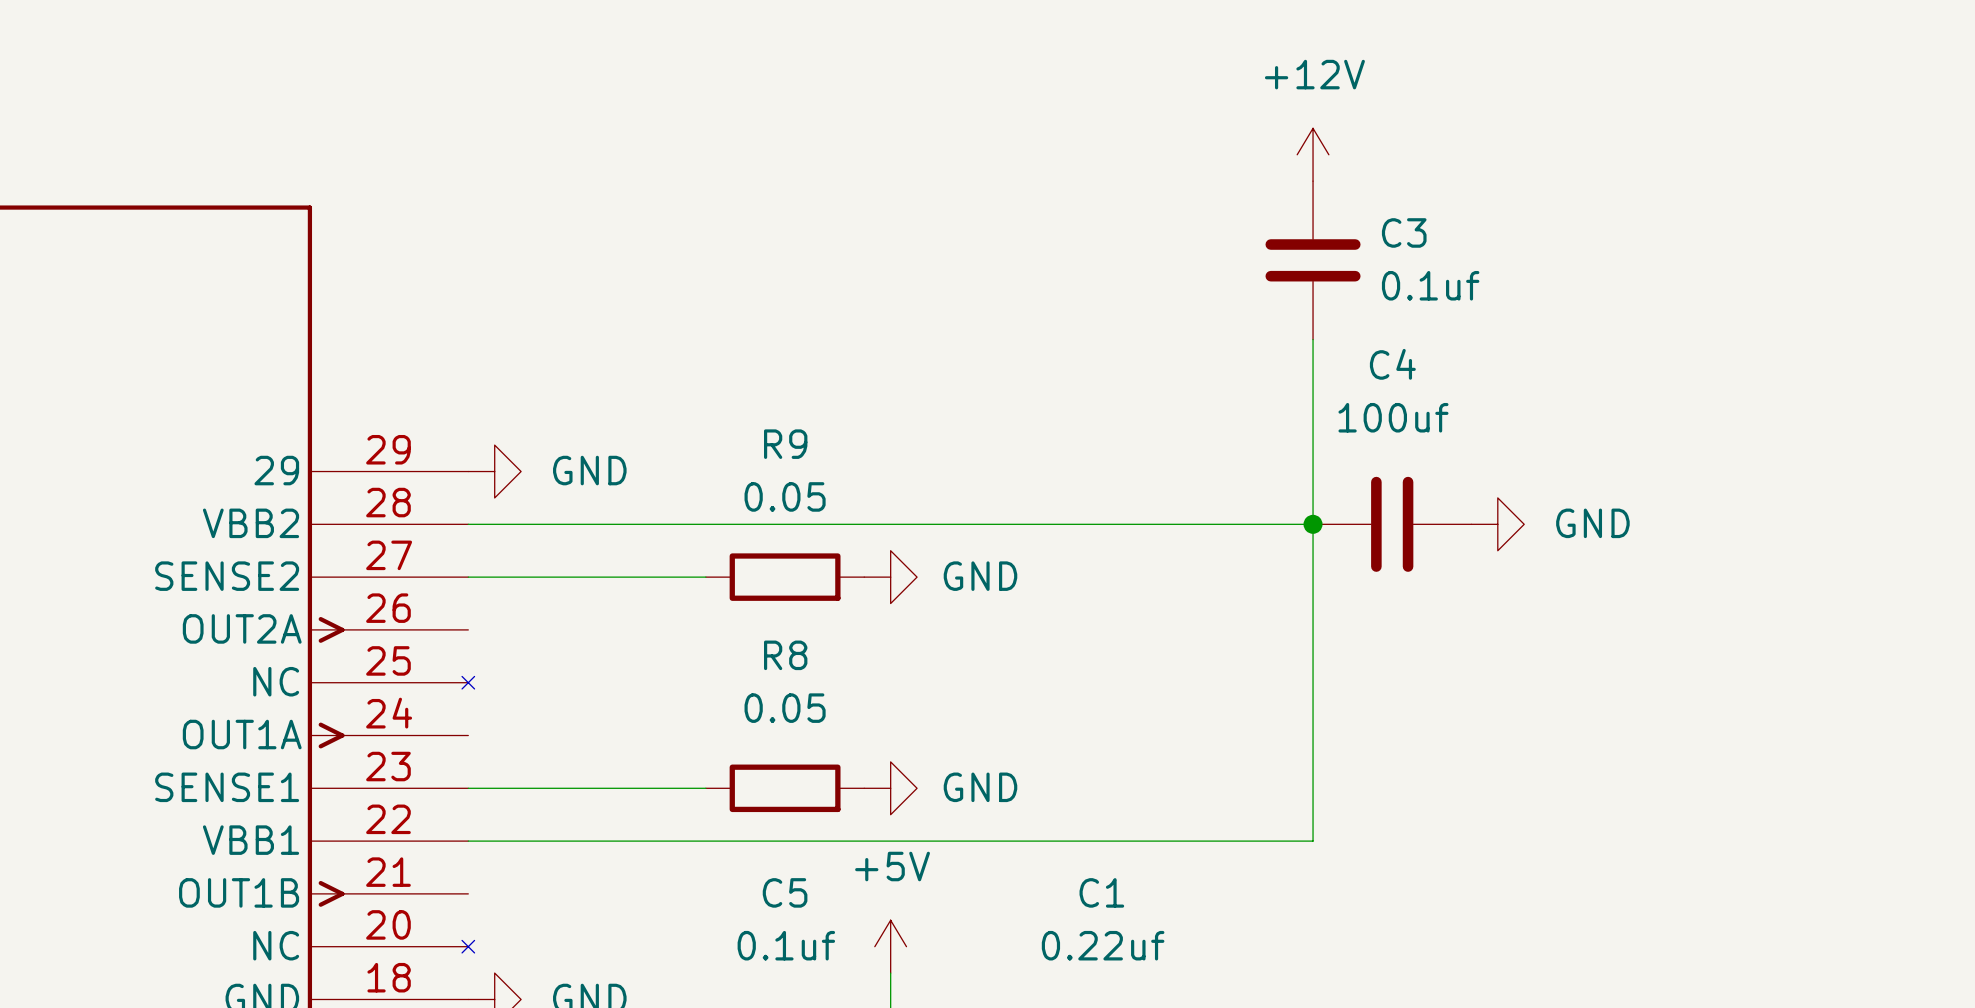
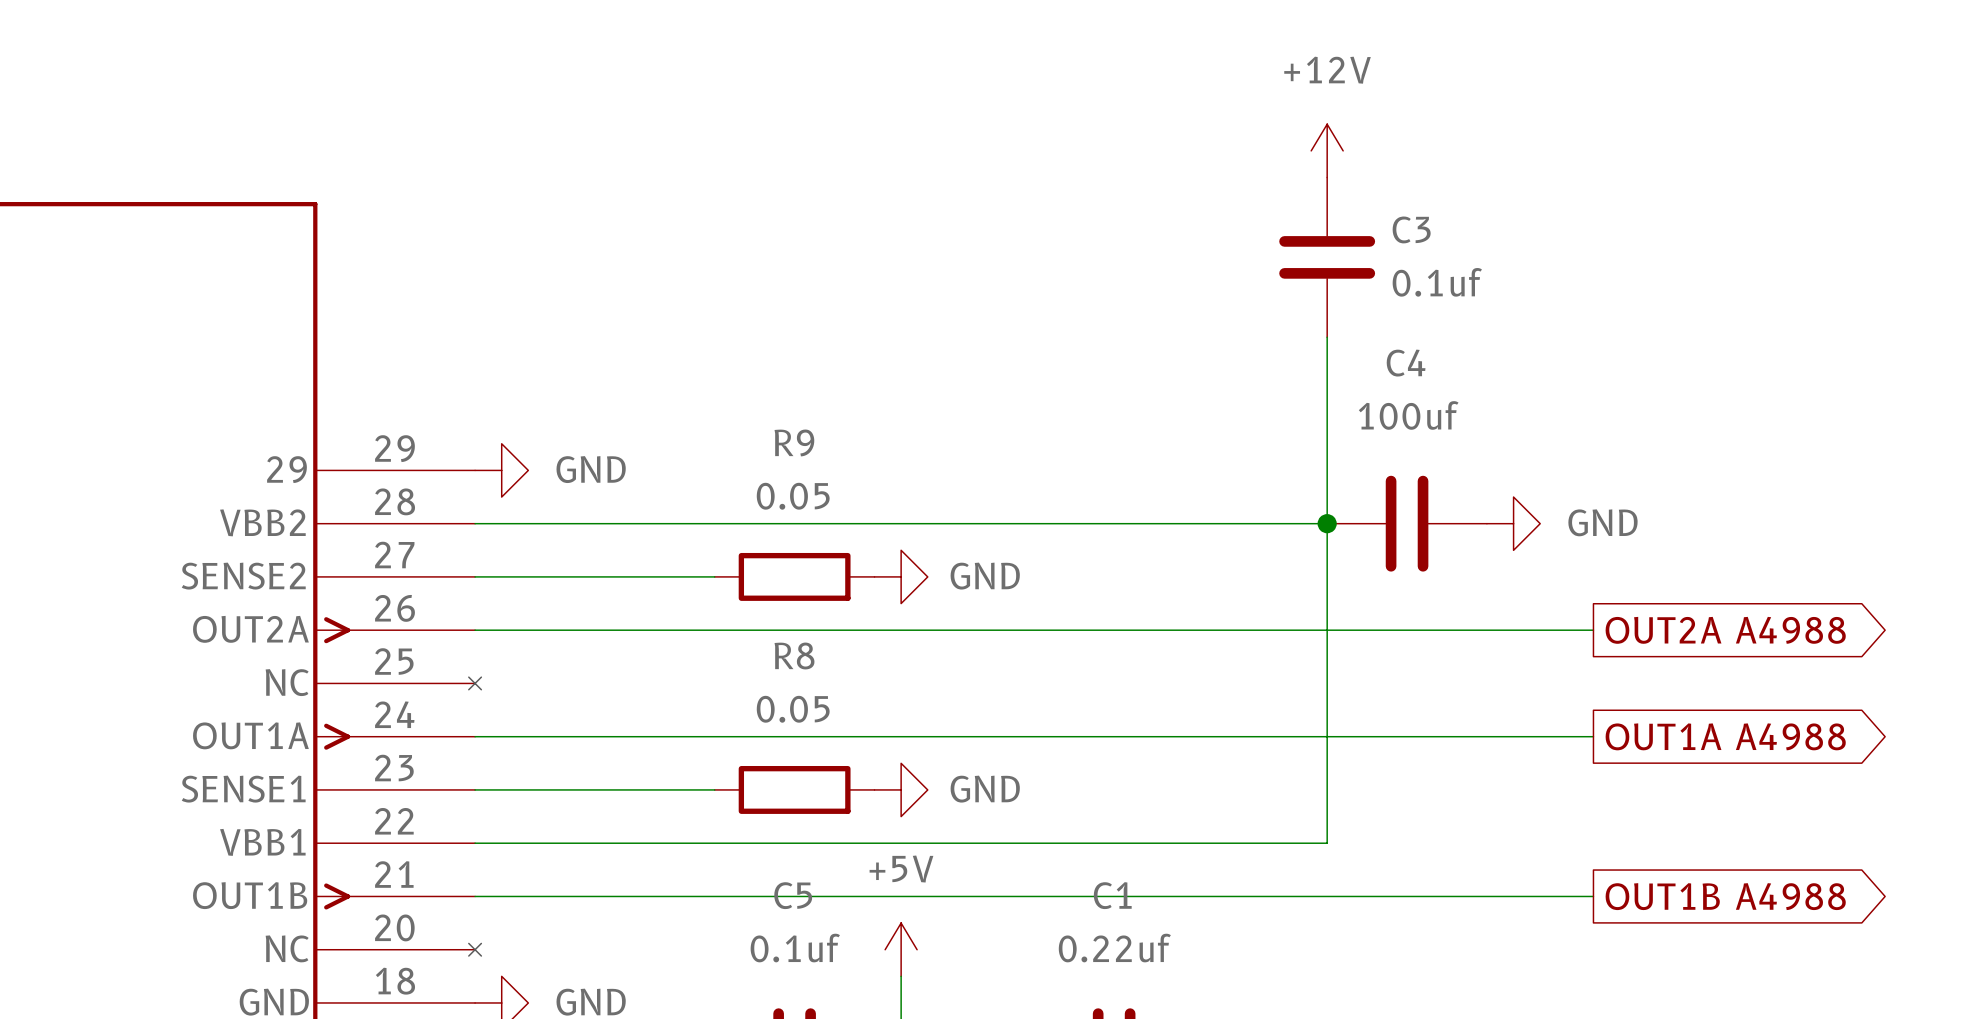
wire: none -> (475, 630) (1593, 630)
global label: none -> OUT2A A4988 (1725, 630)
global label: none -> OUT1A A4988 (1725, 736)
wire: none -> (475, 736) (1593, 736)
wire: none -> (475, 896) (1593, 896)
global label: none -> OUT1B A4988 (1725, 896)

